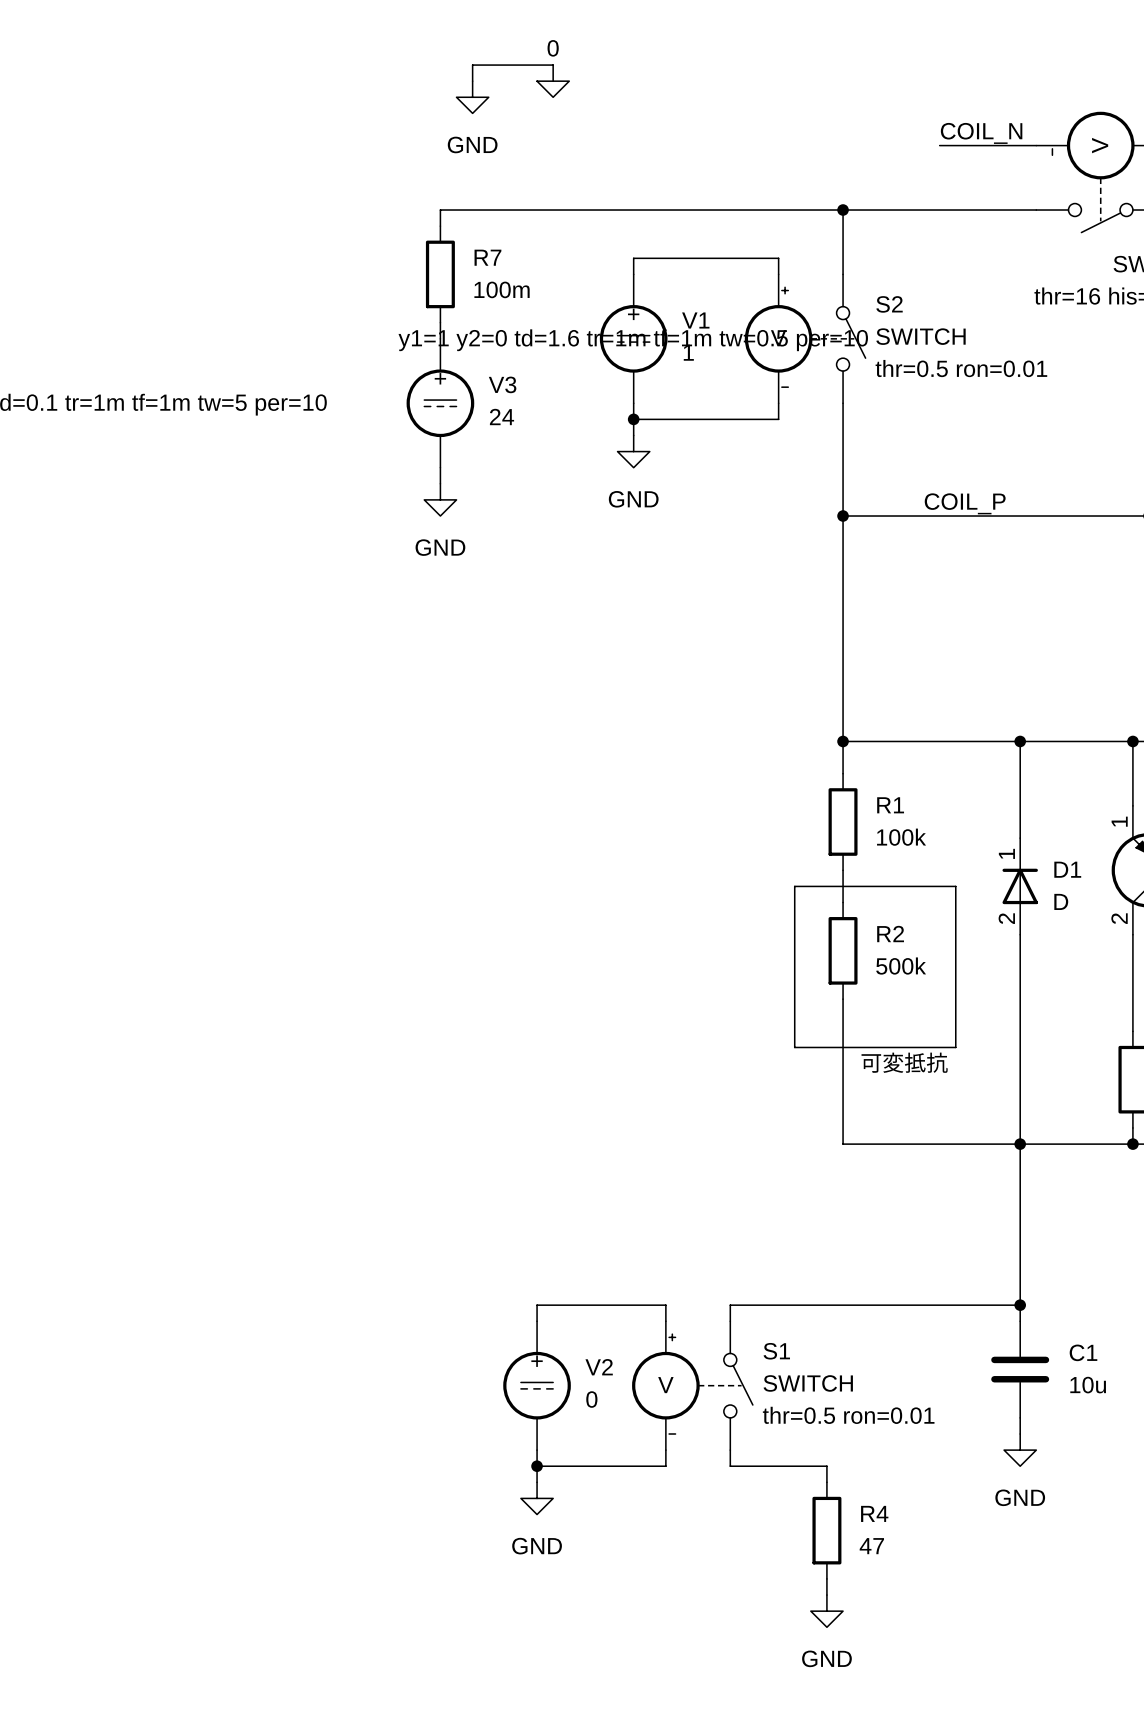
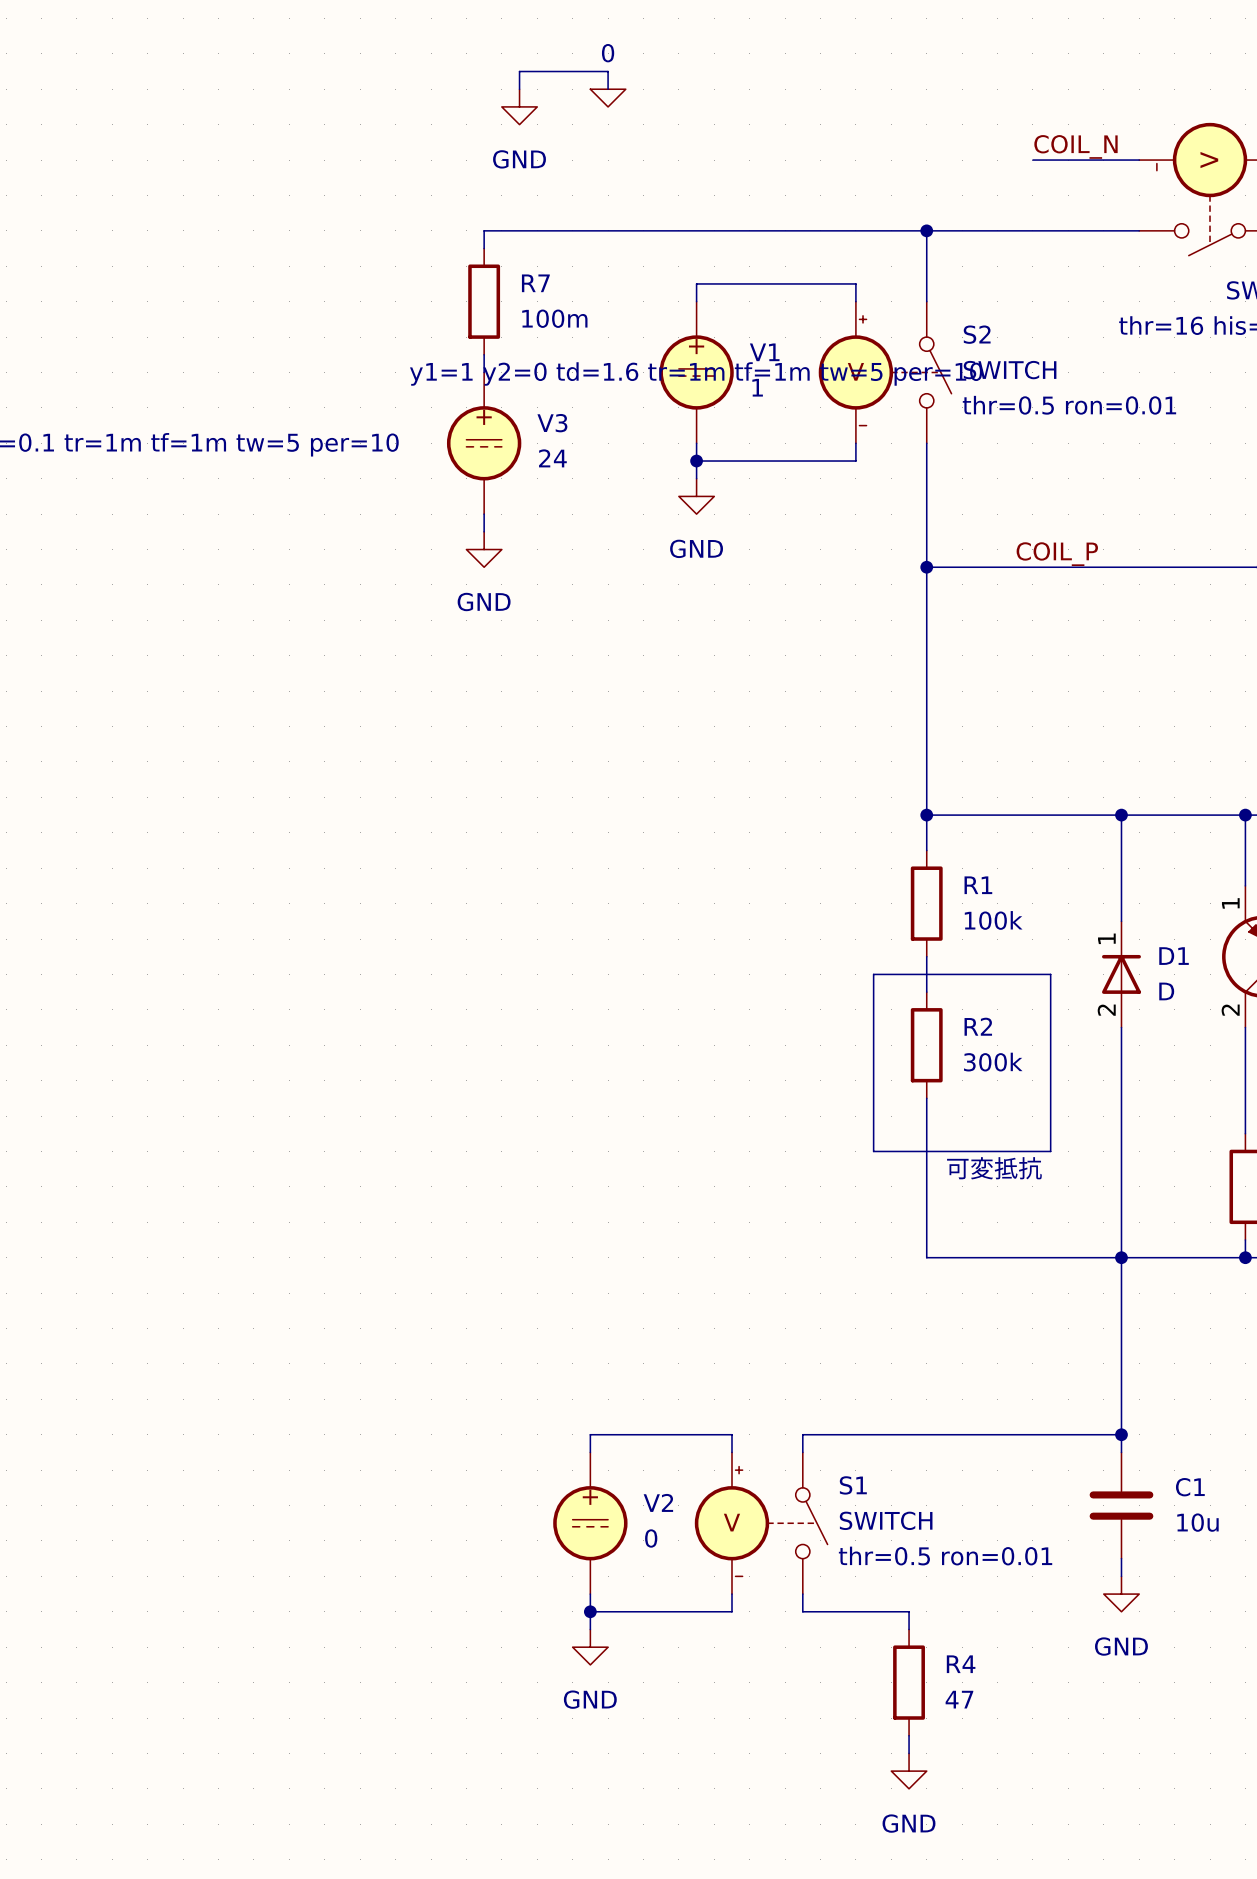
V1 text: y1=1 y2=0 td=1.6 tr=1m tf=1m tw=0.5 per=10 (633, 340) -> y1=1 y2=0 td=1.6 tr=1m tf=1m tw=5 per=10 (696, 373)
R2 value: 500k (901, 966) -> 300k (993, 1062)

